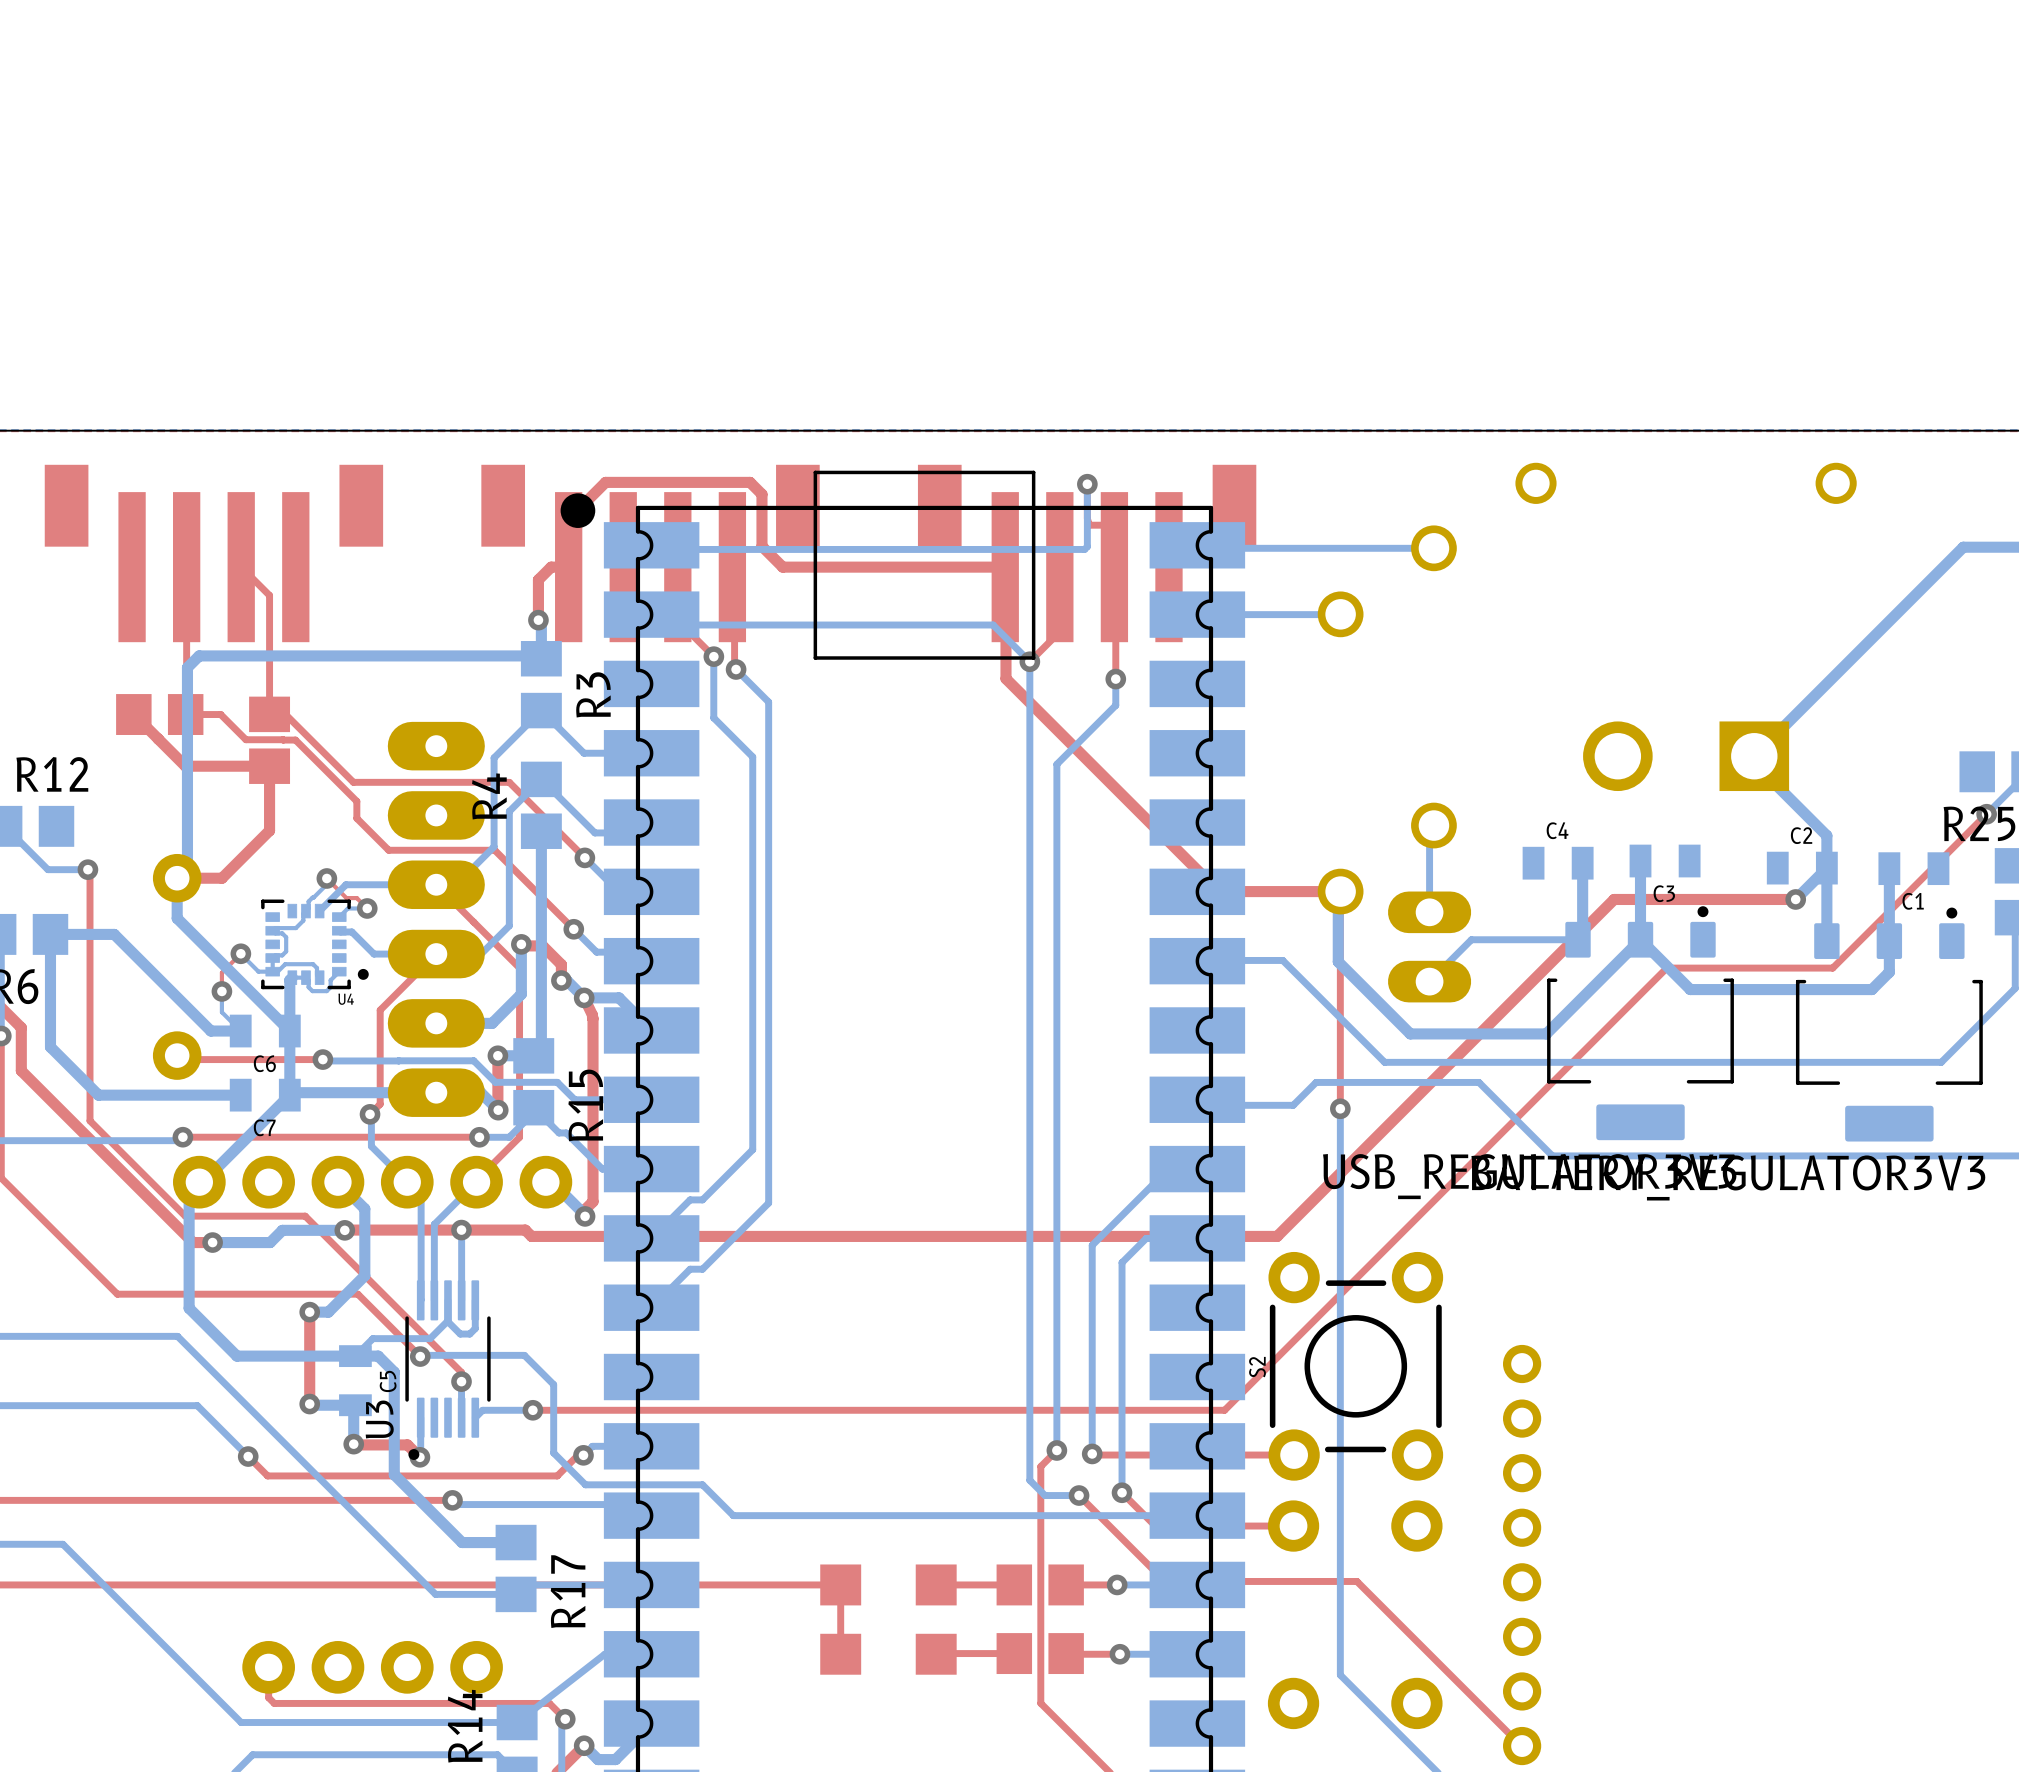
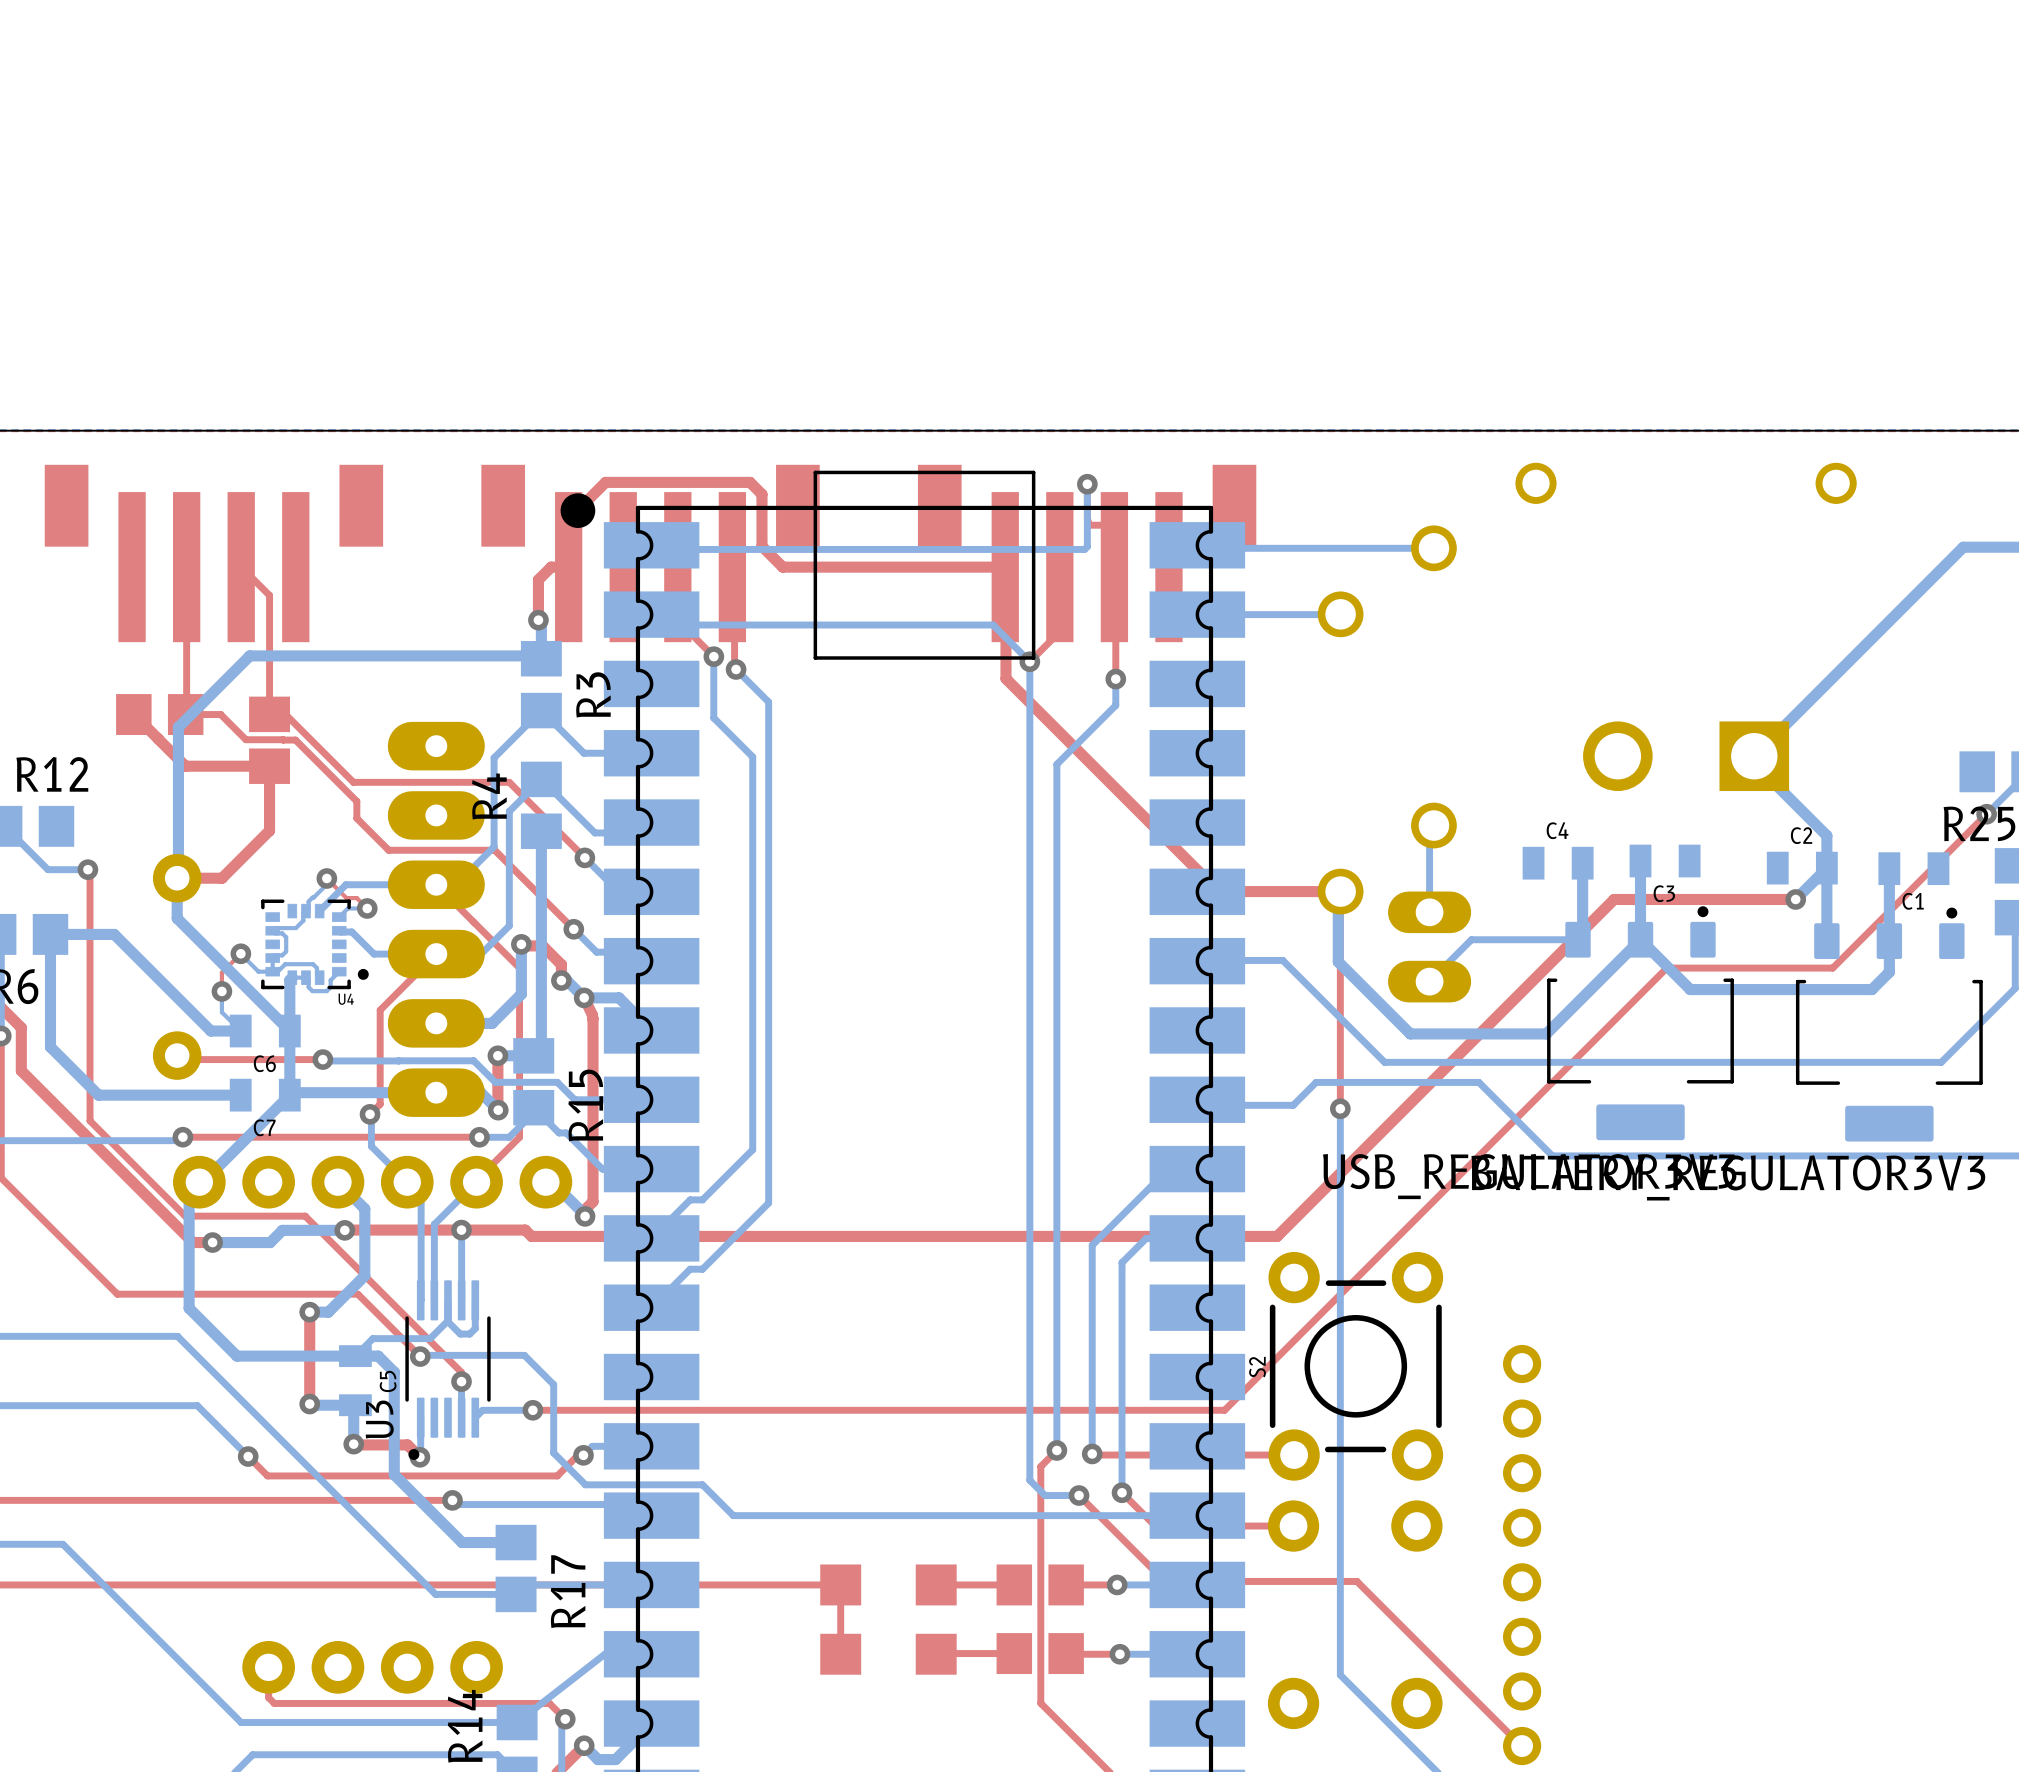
bottom track: (249, 655) (199, 655) (187, 667) (187, 867) (178, 876) -> (249, 655) (178, 727) (178, 876)

